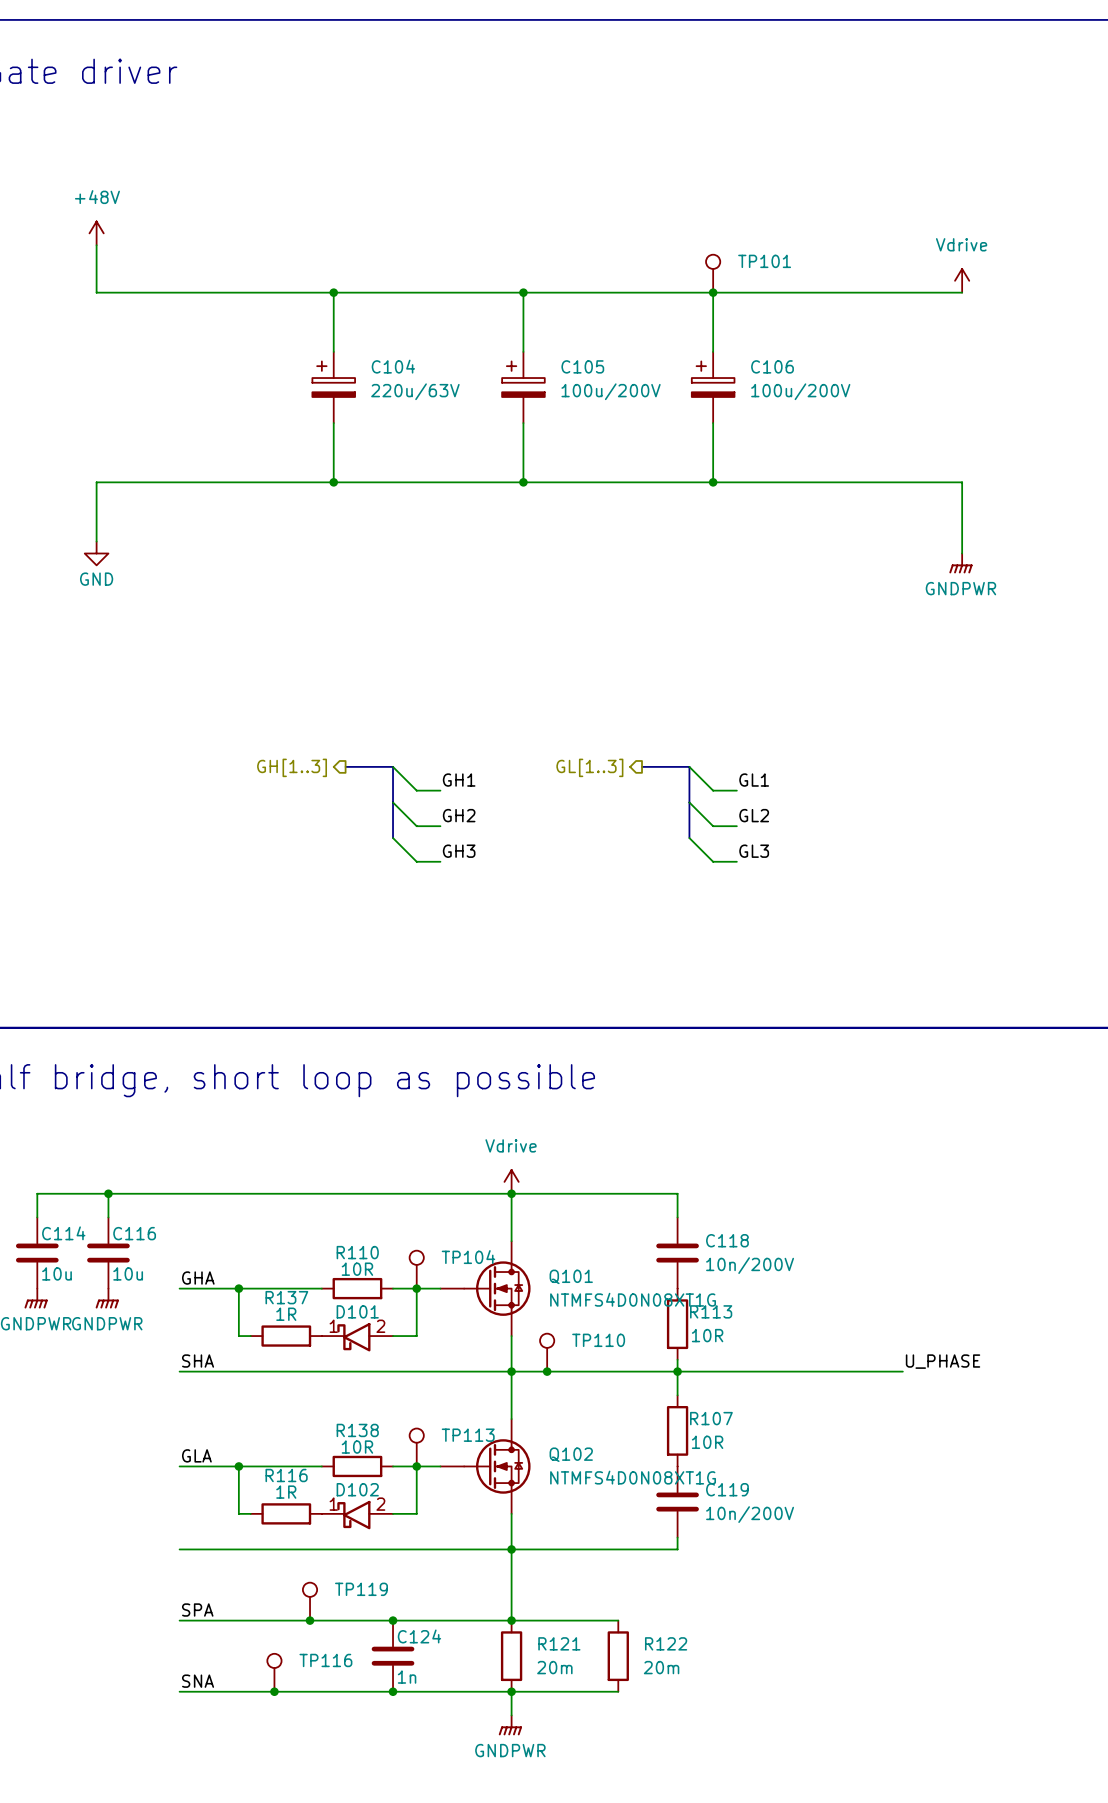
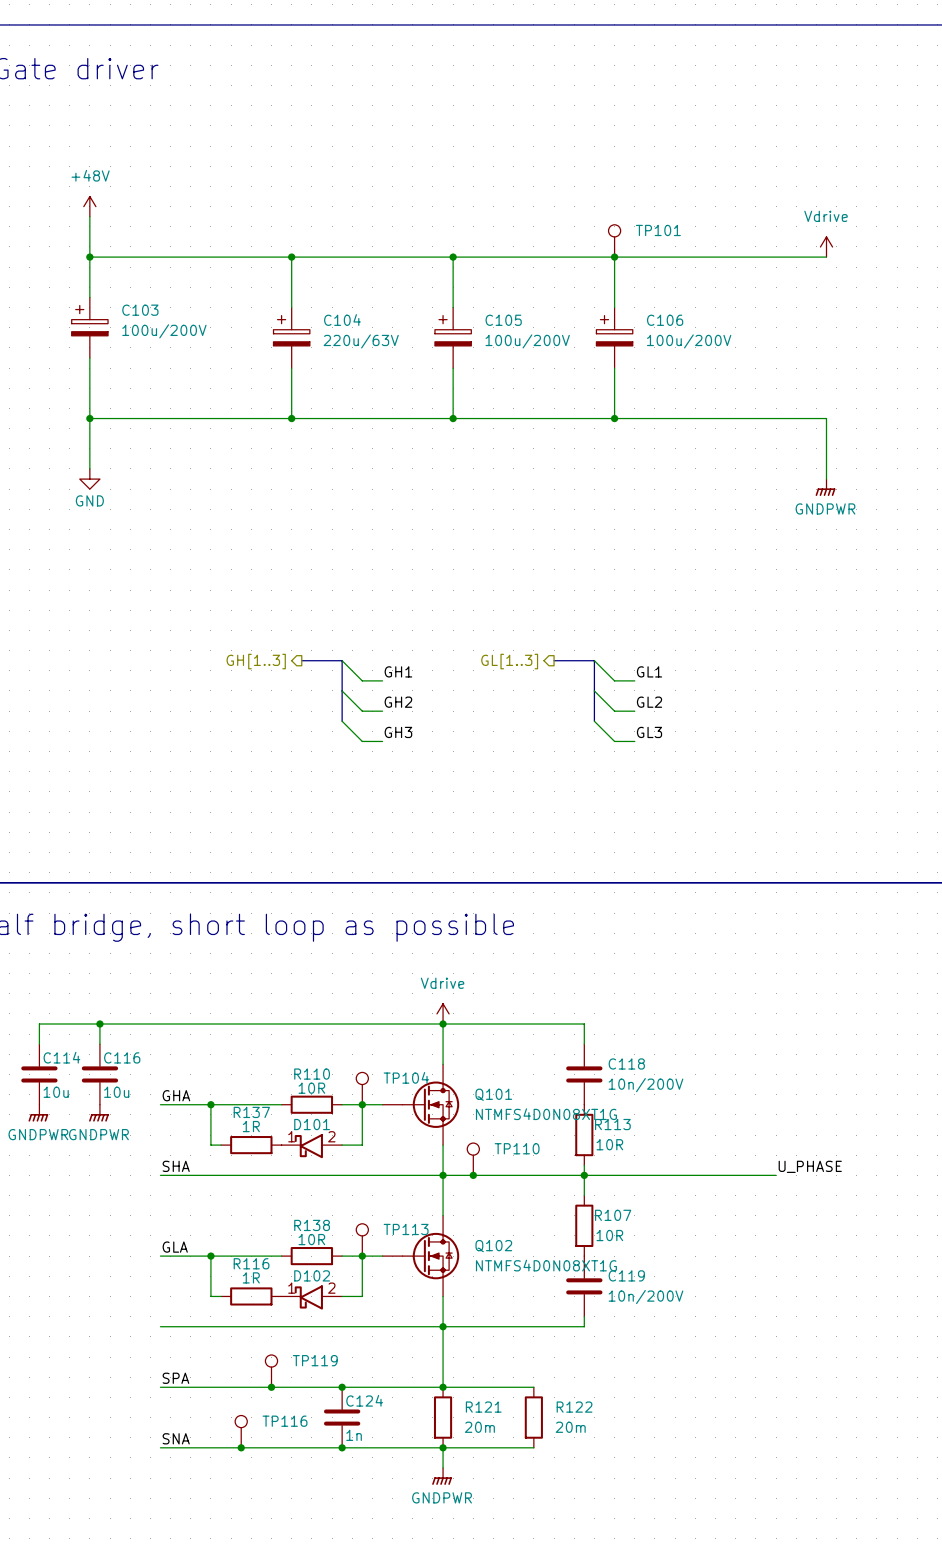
wire: none -> (89, 257) (89, 297)
junction: none -> (89, 257)
C103: none -> 100u/200V (89, 327)
wire: none -> (89, 357) (89, 418)
junction: none -> (89, 418)

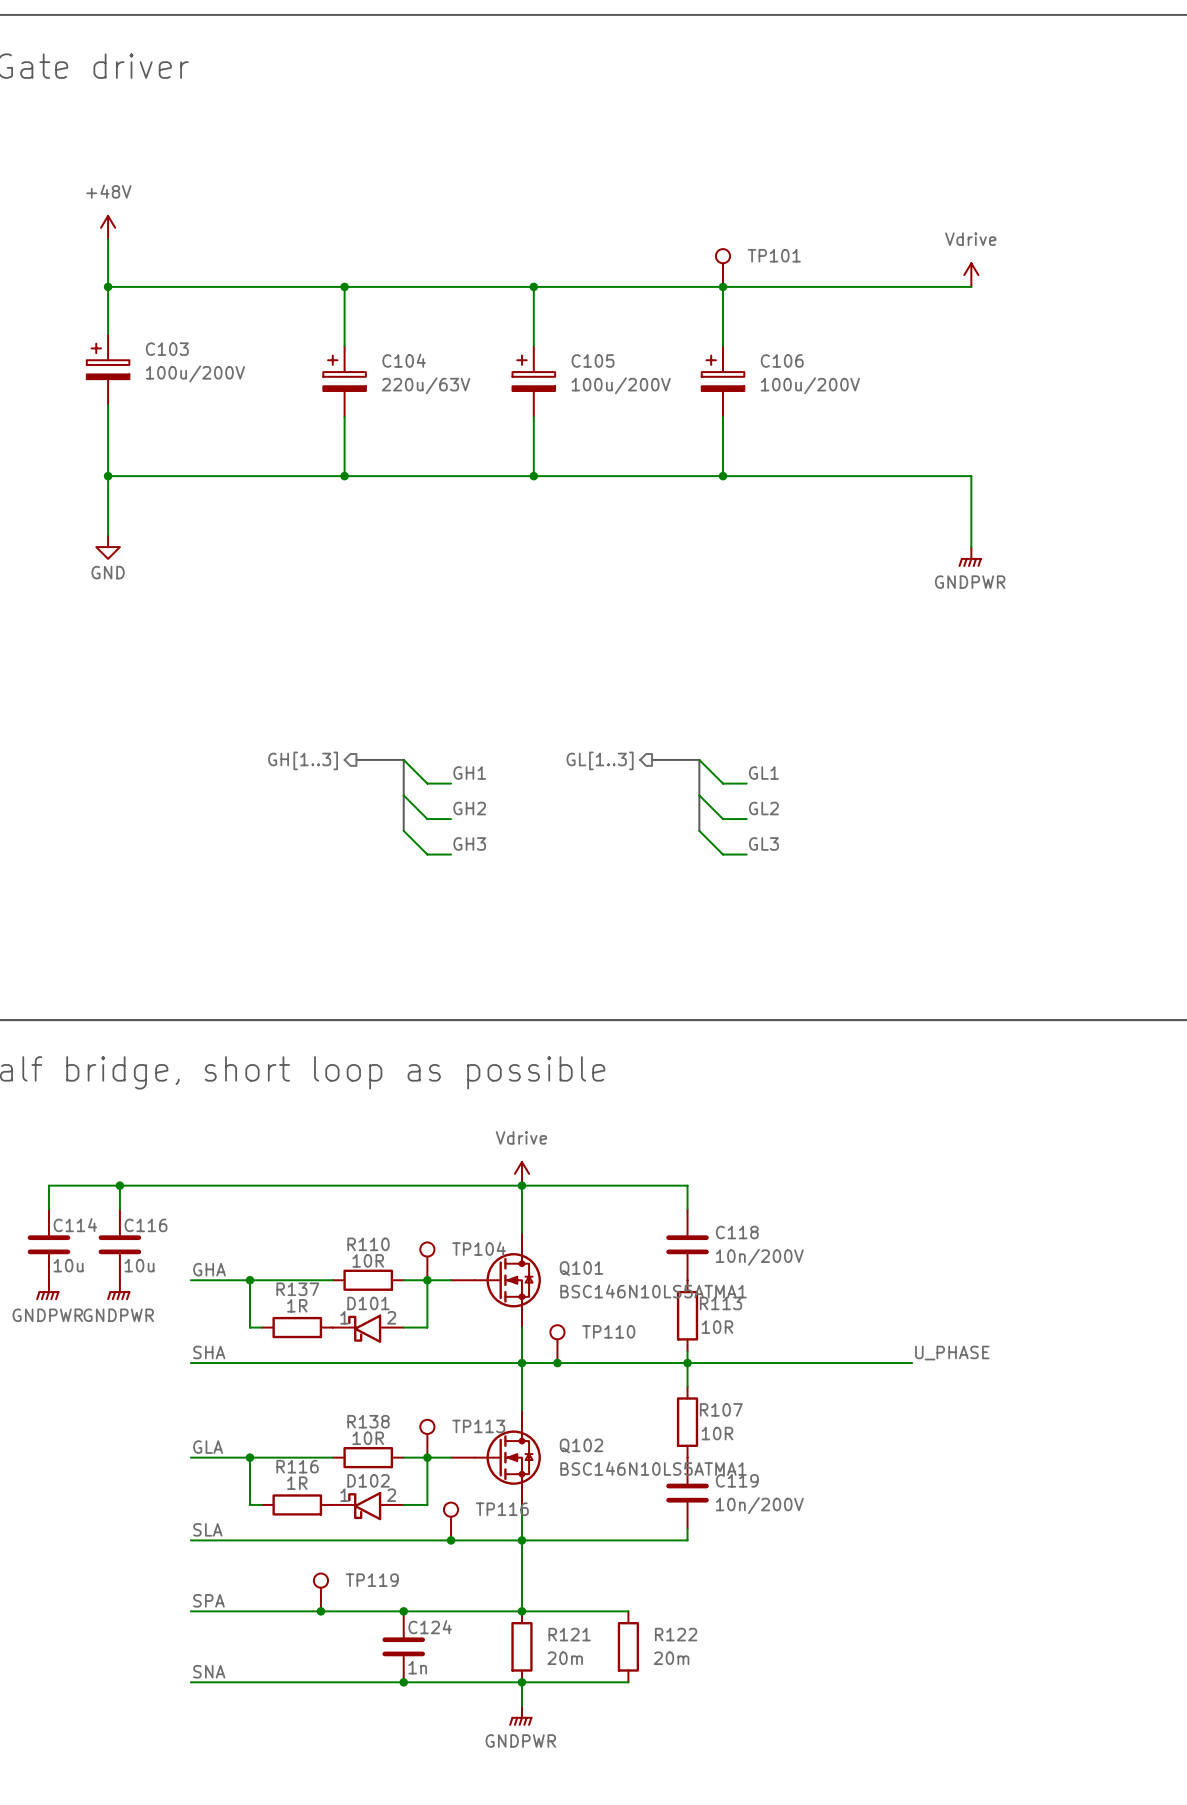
Q101 value: NTMFS4D0N08XT1G (546, 1114) -> BSC146N10LS5ATMA1 (653, 1291)
Q102 value: NTMFS4D0N08XT1G (546, 1265) -> BSC146N10LS5ATMA1 (653, 1468)
label: none -> SLA (207, 1529)
junction: none -> (451, 1540)
TP116 position: (241, 1431) -> (451, 1521)
junction: (241, 1447) -> none

